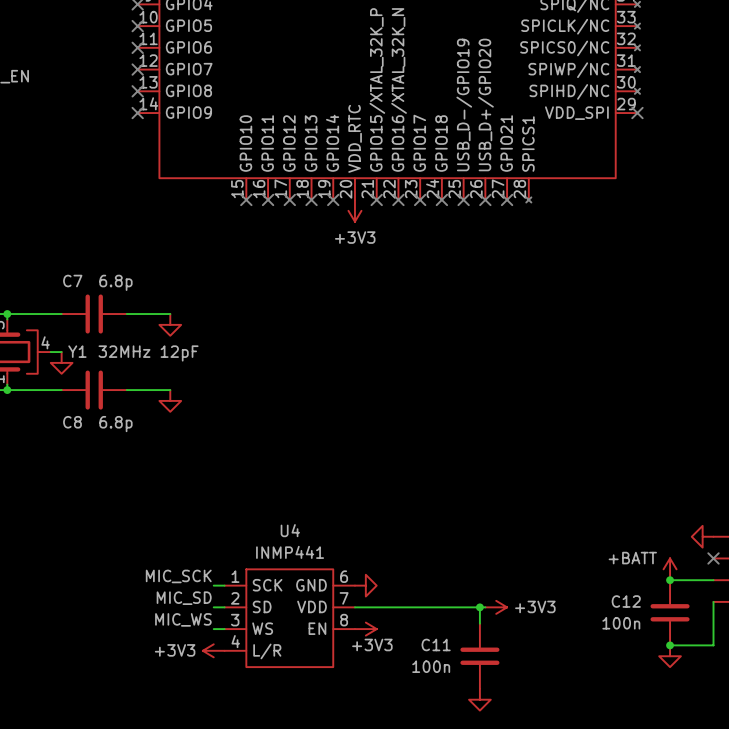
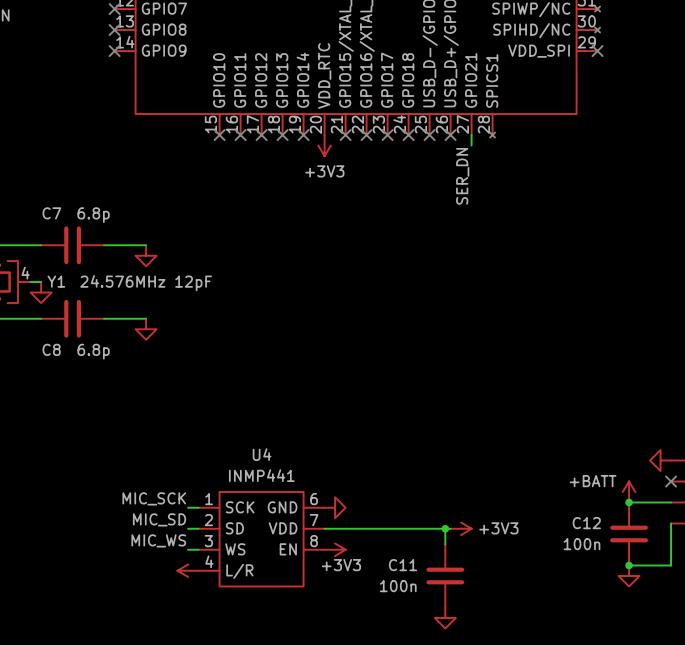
wire: none -> (471, 135) (471, 145)
no-connect mark: (507, 199) -> none
label: none -> SER_DN (462, 176)
Y1 value: 32MHz 12pF (148, 353) -> 24.576MHz 12pF (146, 283)
power symbol text: +3V3 (175, 650) -> none

